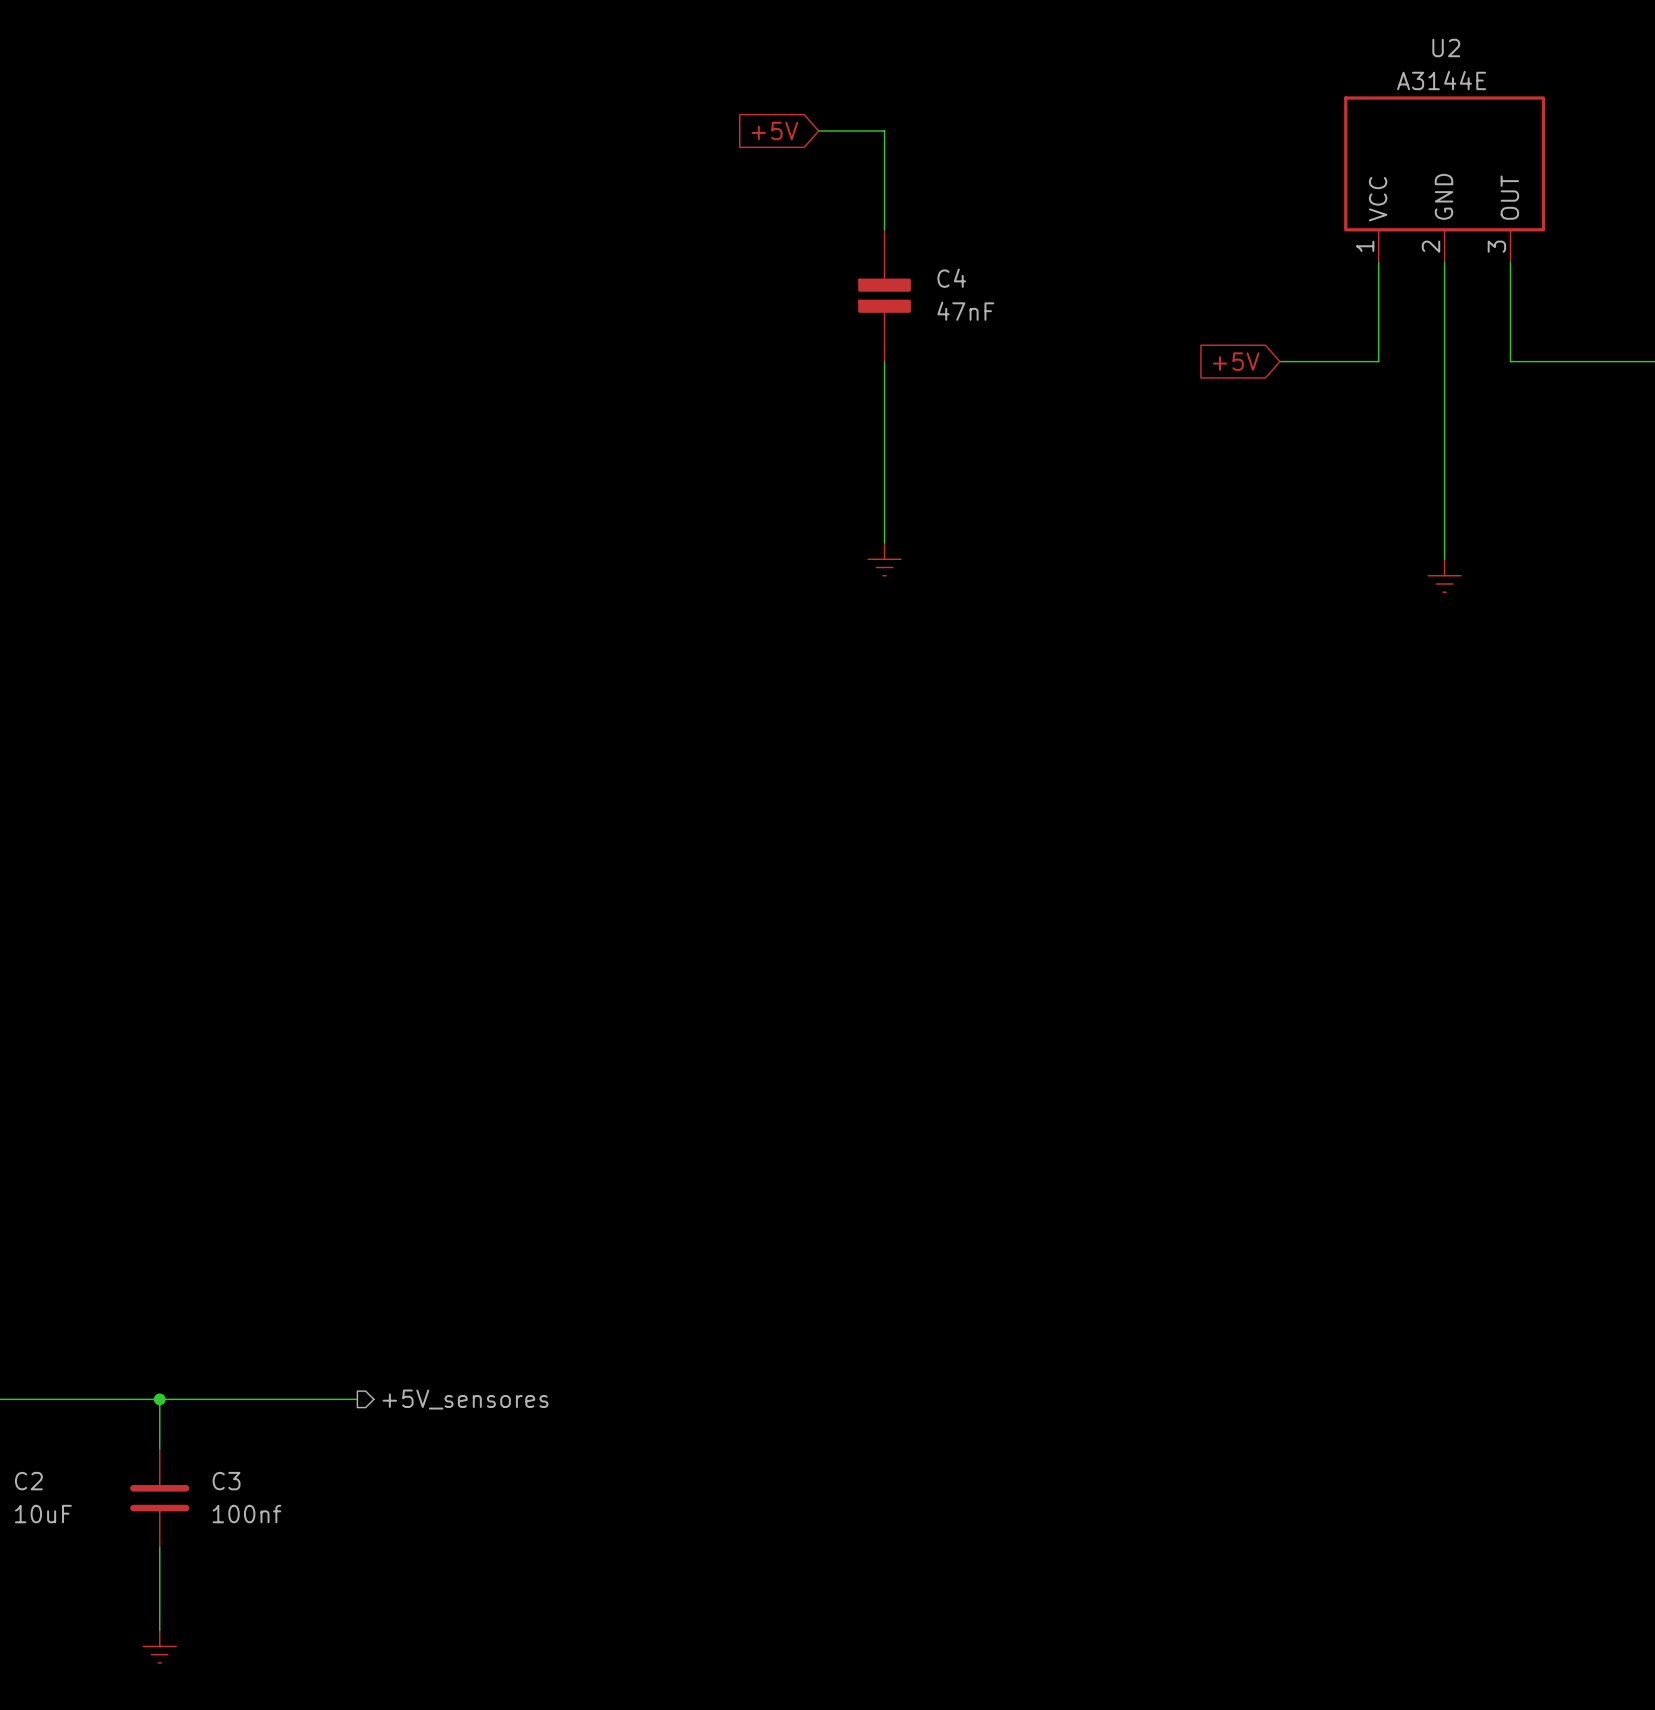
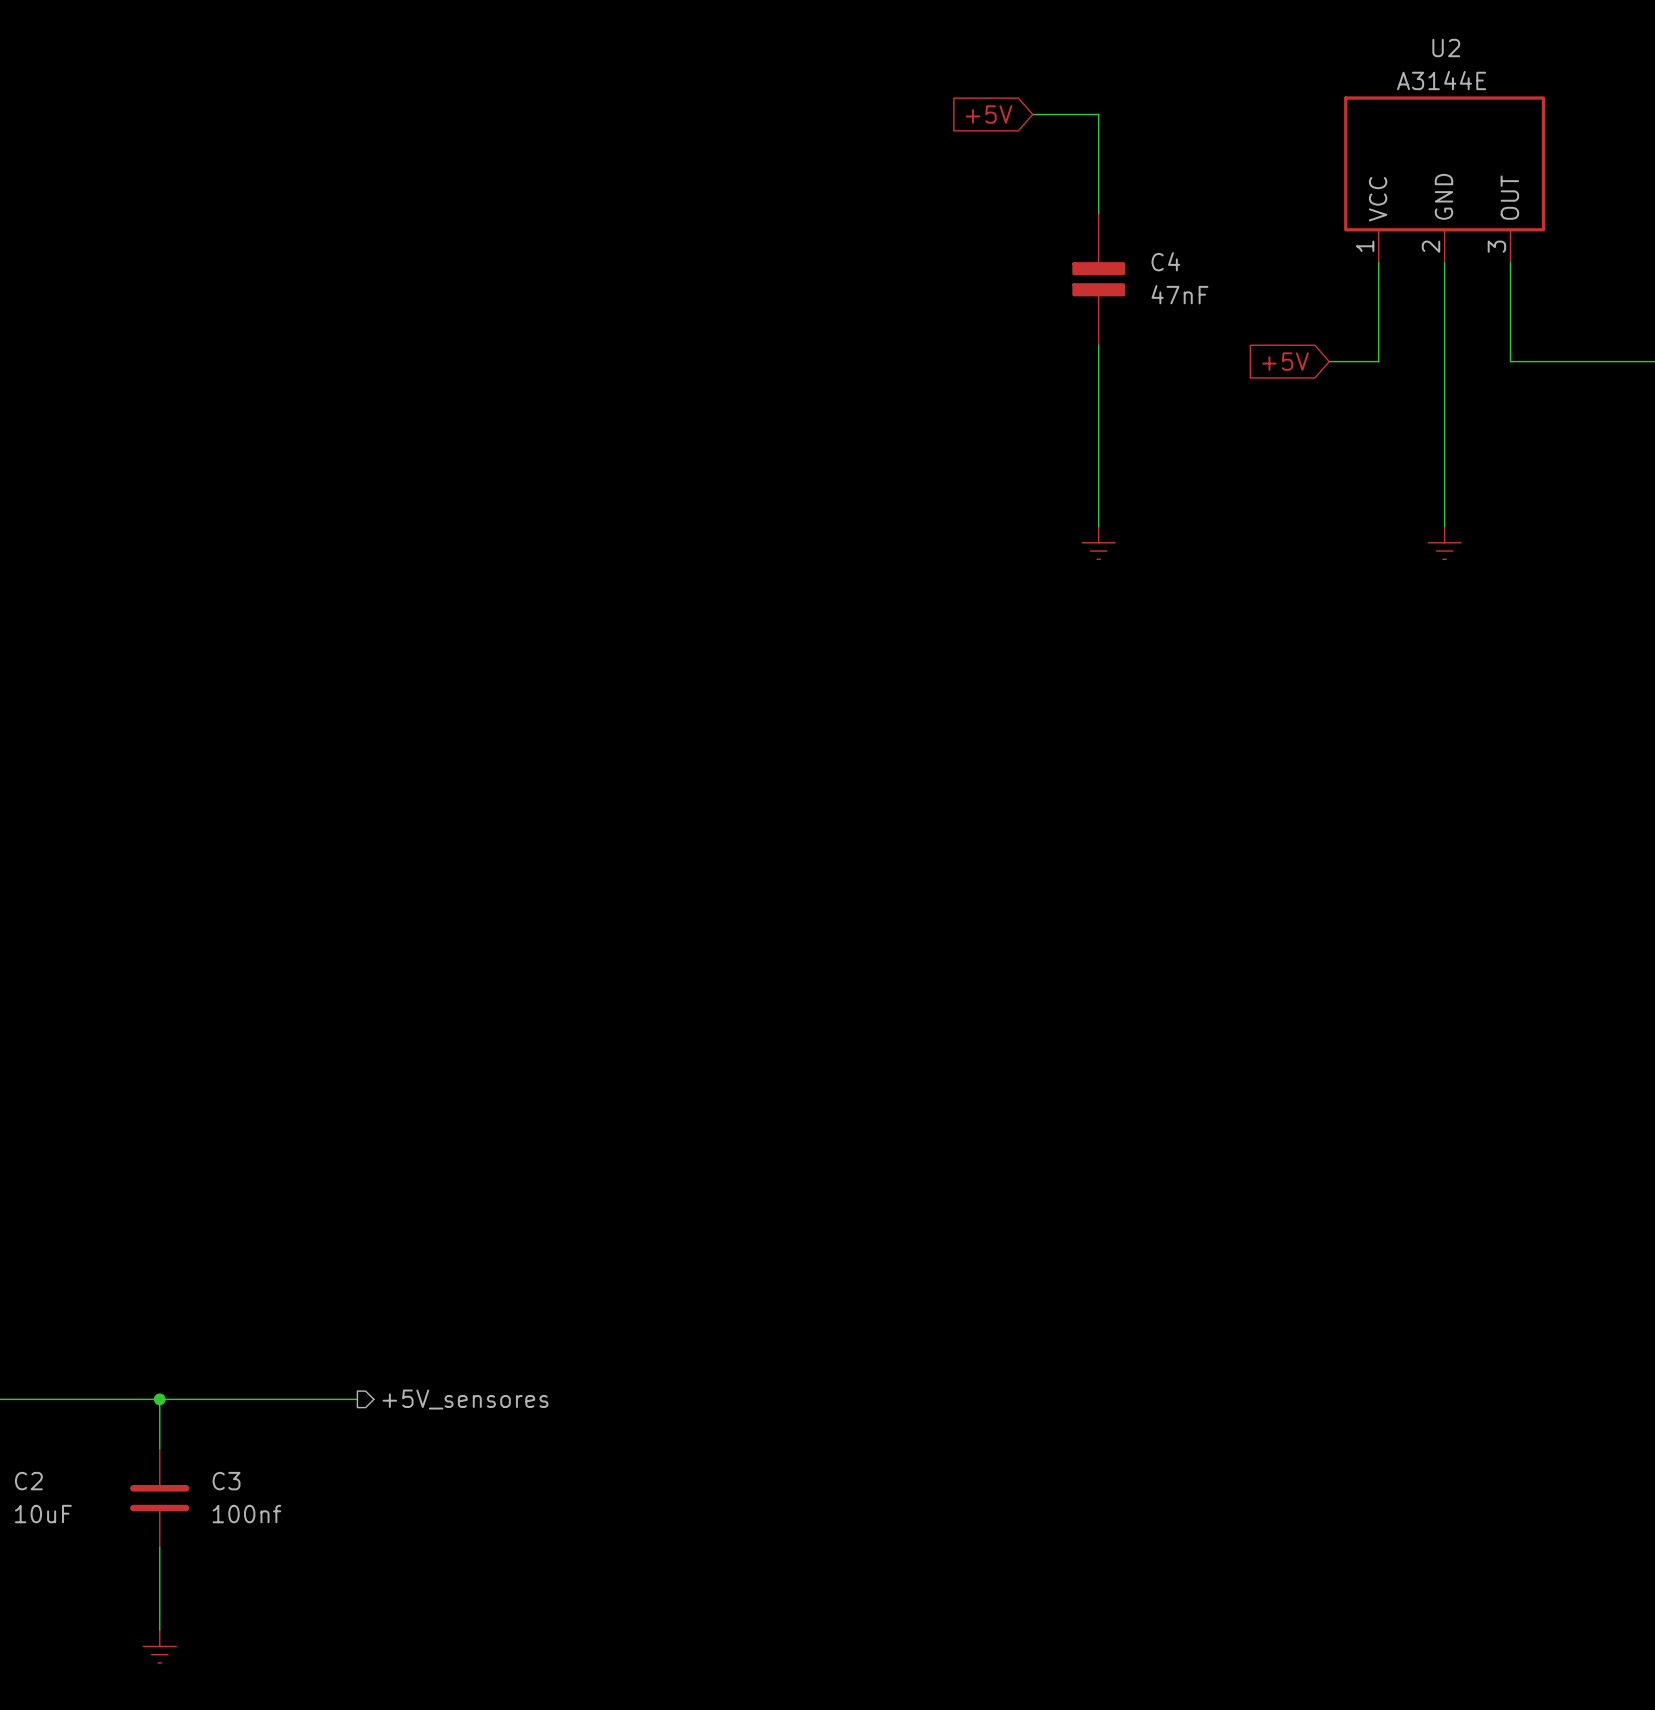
global label: none -> +5V (989, 114)
global label: +5V (774, 130) -> none
wire: (818, 130) (884, 130) (884, 229) -> (1032, 114) (1098, 114) (1098, 213)
C4 position: (884, 295) -> (1098, 279)
wire: (884, 361) (884, 542) -> (1098, 345) (1098, 526)
global label position: +5V (1236, 361) -> +5V (1285, 361)
wire: (1279, 361) (1329, 361) -> none
power symbol: none -> (1098, 542)
power symbol: (884, 559) -> none
power symbol position: (1444, 575) -> (1444, 542)

